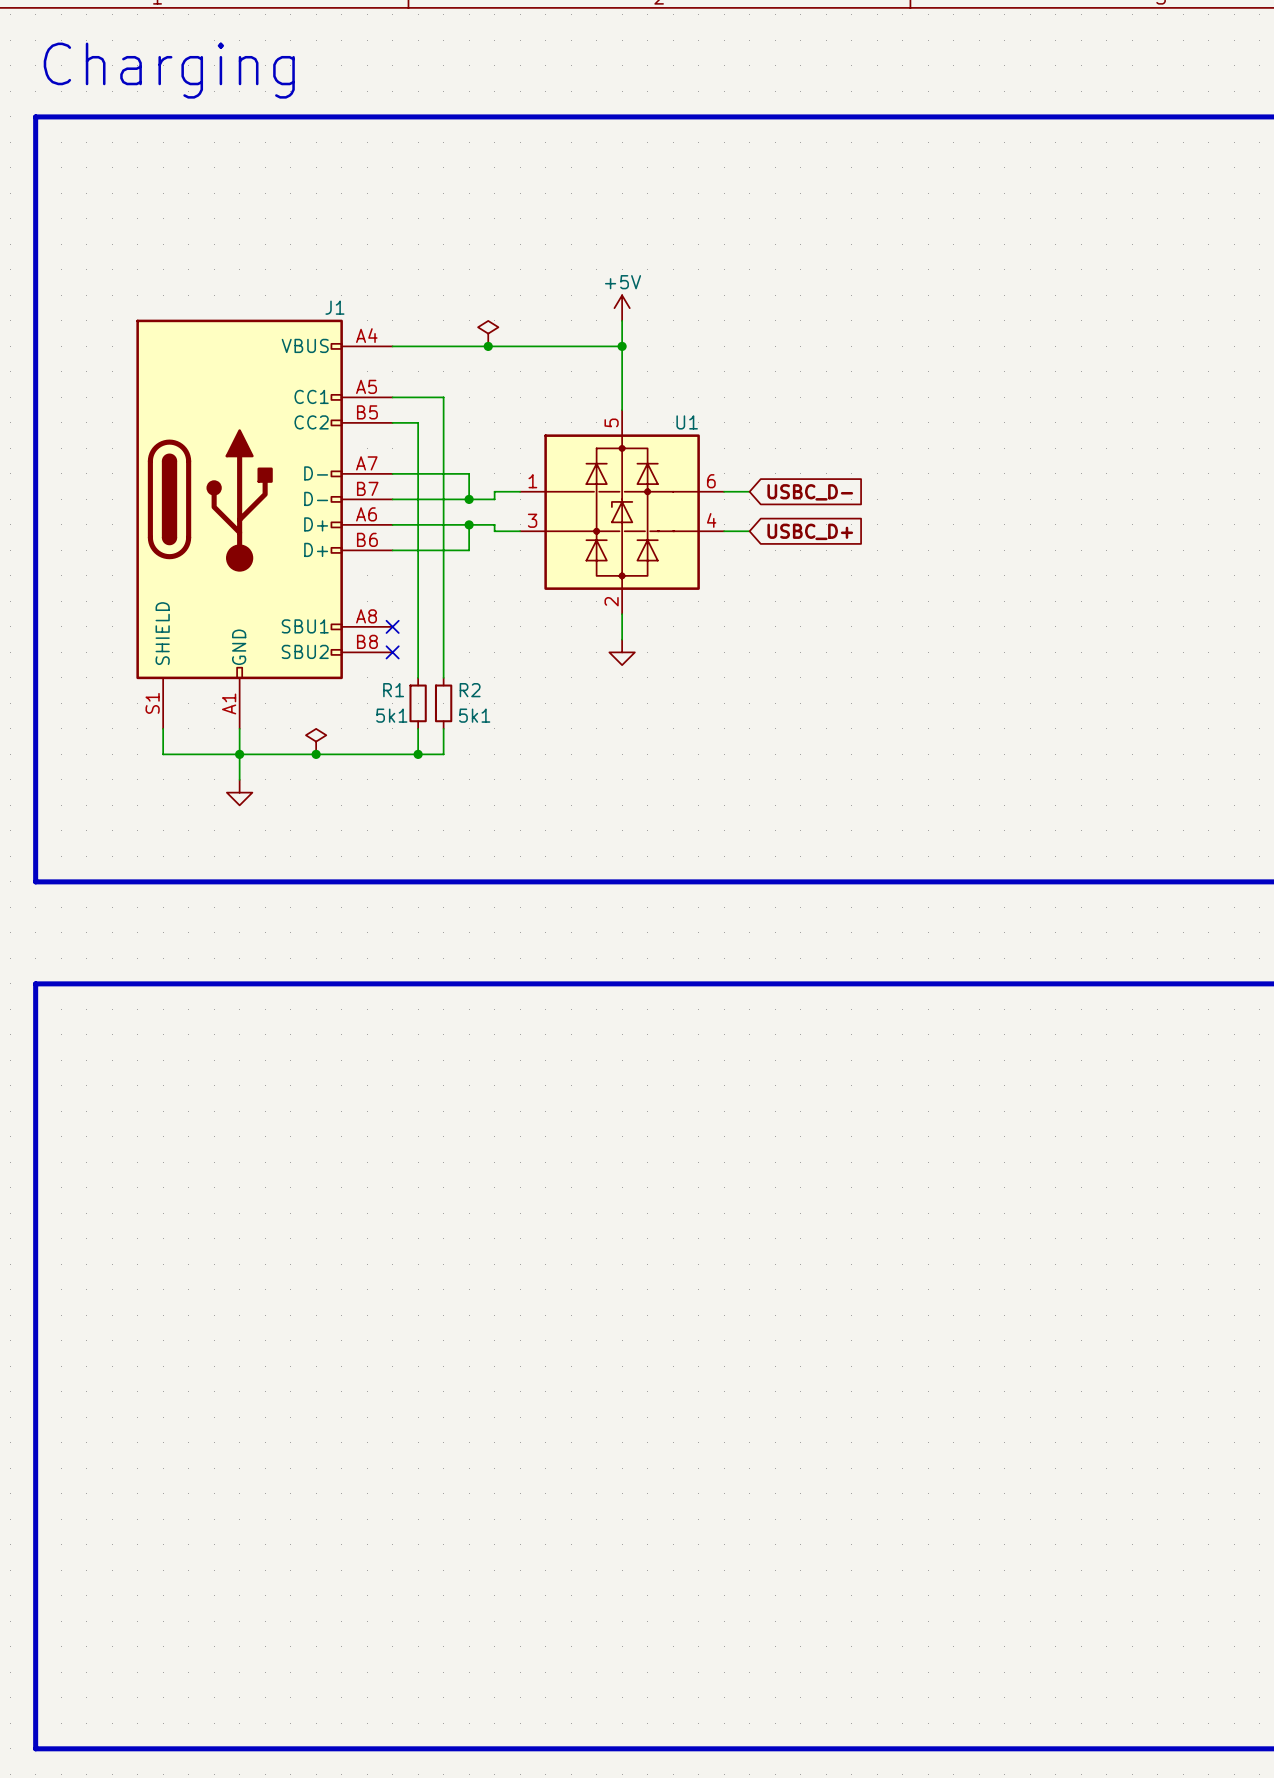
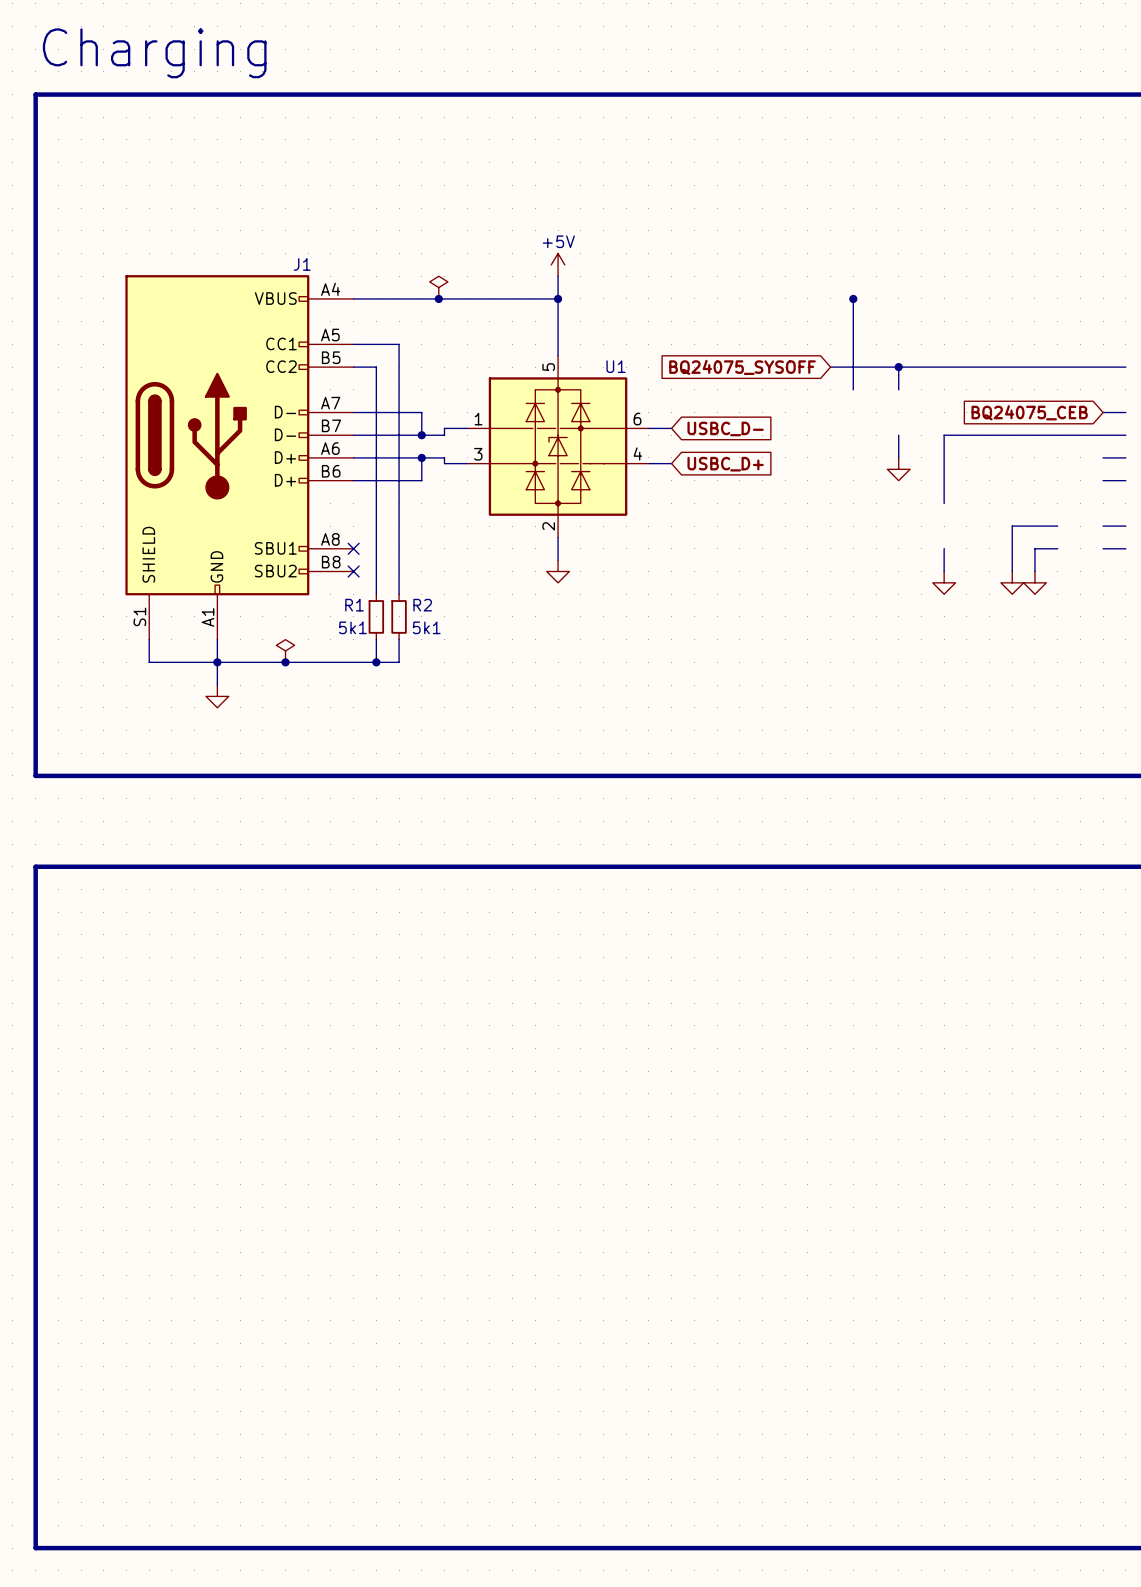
wire: none -> (853, 298) (853, 389)
junction: none -> (853, 298)
wire: none -> (830, 367) (1125, 367)
wire: none -> (898, 367) (898, 389)
junction: none -> (898, 367)
global label: none -> BQ24075_SYSOFF (742, 367)
wire: none -> (1103, 412) (1125, 412)
global label: none -> BQ24075_CEB (1029, 412)
wire: none -> (898, 435) (898, 457)
wire: none -> (1125, 435) (944, 435) (944, 503)
wire: none -> (1103, 457) (1125, 457)
power symbol: none -> (898, 469)
wire: none -> (1103, 480) (1125, 480)
wire: none -> (1057, 526) (1012, 526) (1012, 571)
wire: none -> (1103, 526) (1125, 526)
wire: none -> (944, 548) (944, 571)
wire: none -> (1057, 548) (1034, 548) (1034, 571)
wire: none -> (1103, 548) (1125, 548)
power symbol: none -> (944, 582)
power symbol: none -> (1012, 582)
power symbol: none -> (1034, 582)

